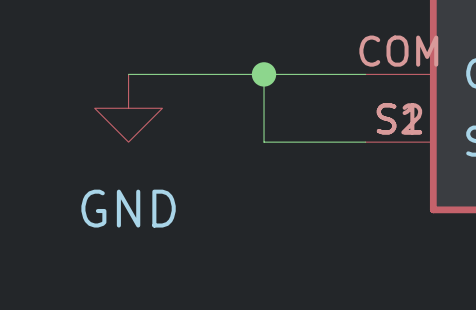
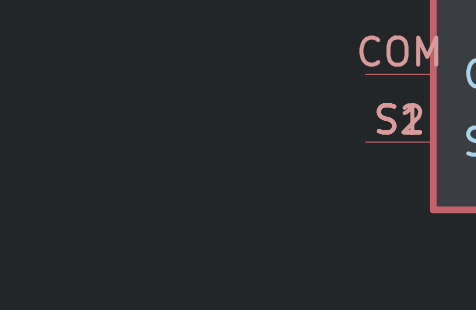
wire: (128, 74) (365, 74) -> none
wire: (264, 74) (264, 142) (365, 142) -> none
junction: (264, 74) -> none
power symbol: GND (128, 108) -> none

